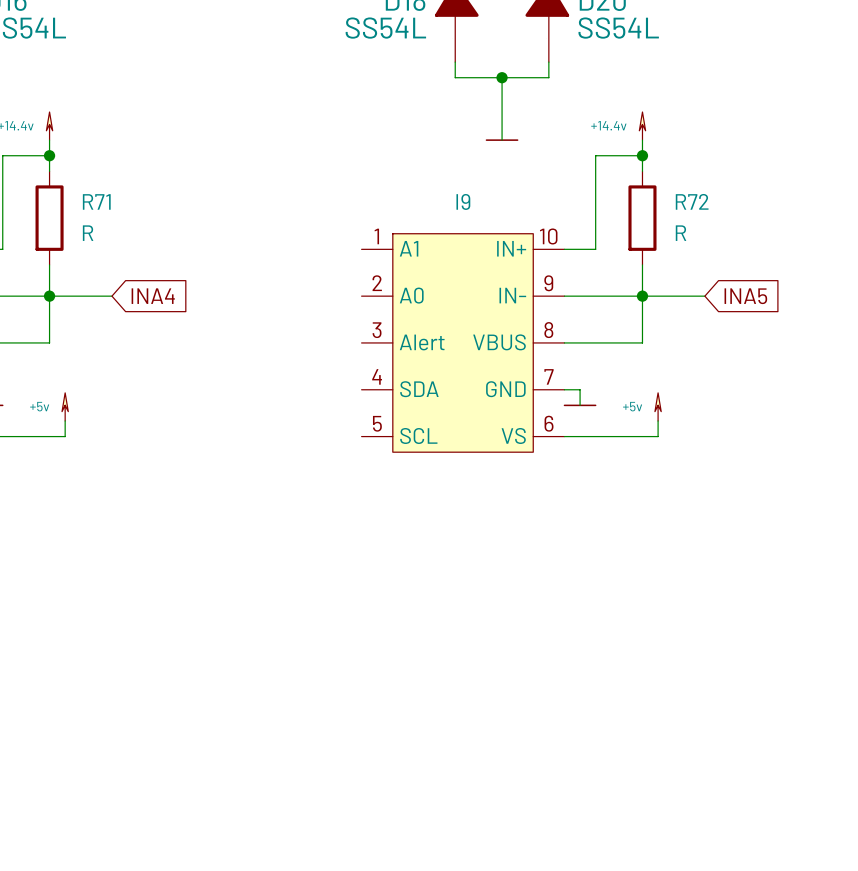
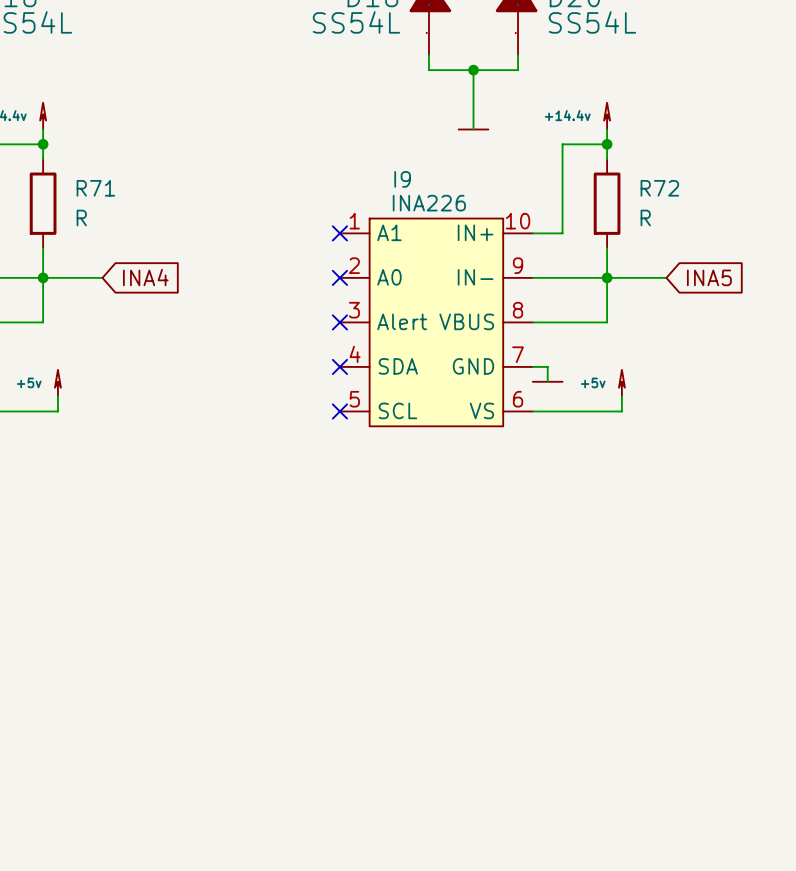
I9 name position: I9 (463, 201) -> I9 (402, 179)
I9 value: none -> INA226 (429, 203)
no-connect mark: none -> (339, 233)
no-connect mark: none -> (339, 277)
no-connect mark: none -> (339, 322)
no-connect mark: none -> (339, 366)
no-connect mark: none -> (339, 411)

